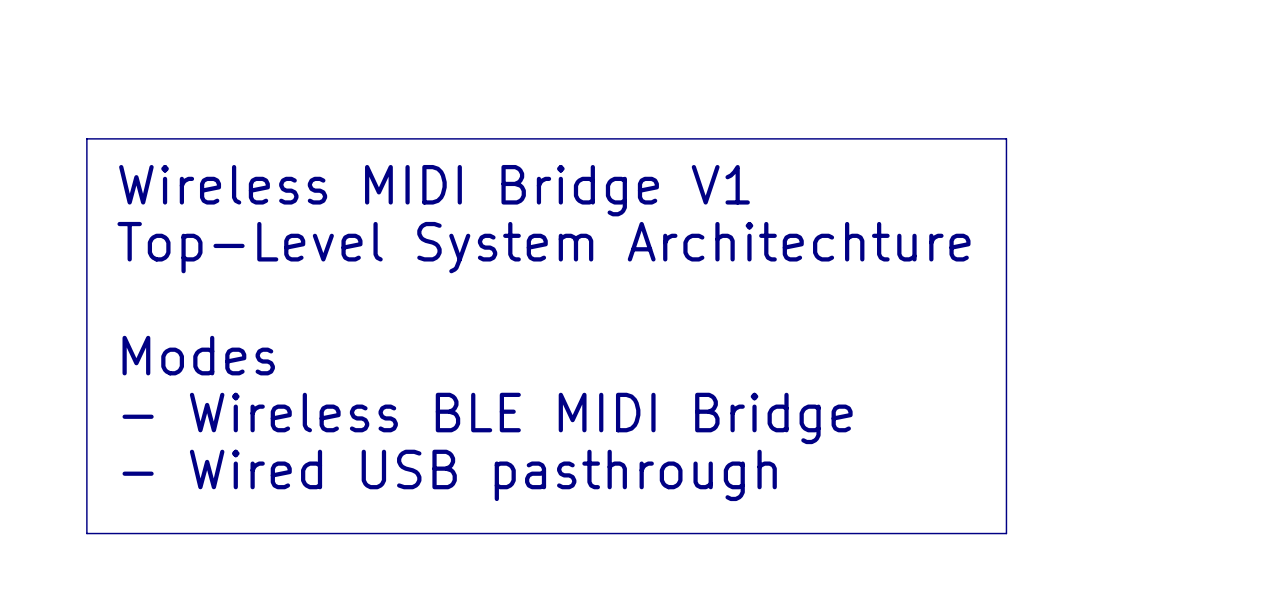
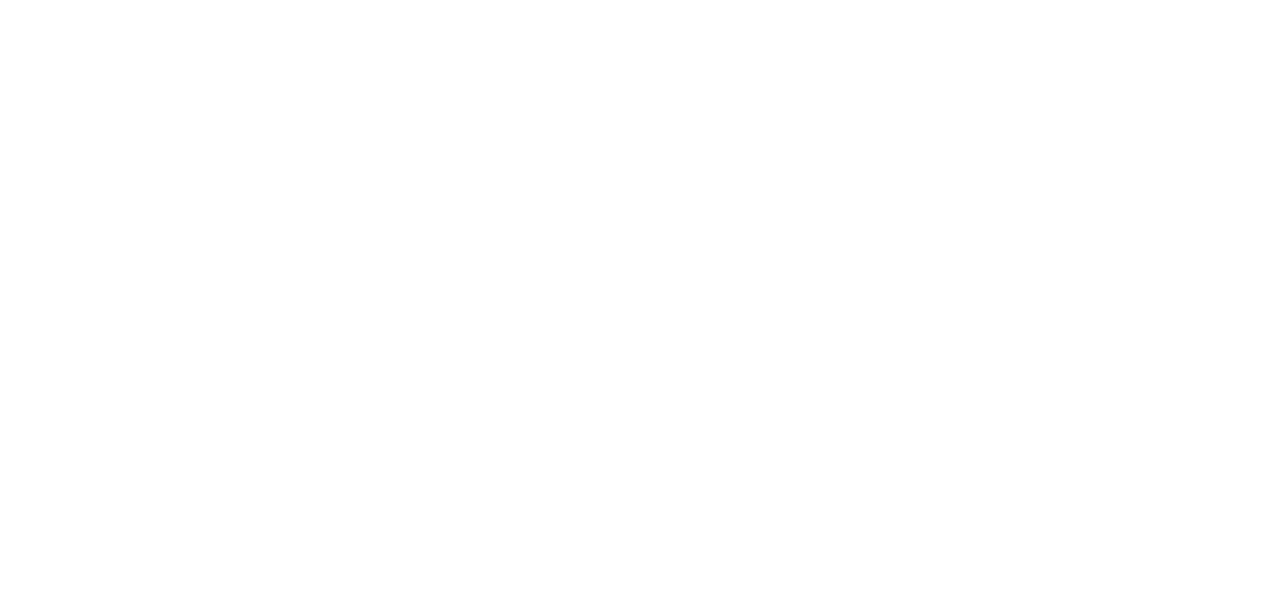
line: (86, 138) (1006, 138) (1006, 533) (86, 533) (86, 138) -> none
text: Wireless MIDI Bridge V1 (434, 190) -> none
text: Top-Level System Architechture (543, 247) -> none
text: Modes (198, 355) -> none
text: - Wireless BLE MIDI Bridge (487, 418) -> none
text: - Wired USB pasthrough (449, 475) -> none

